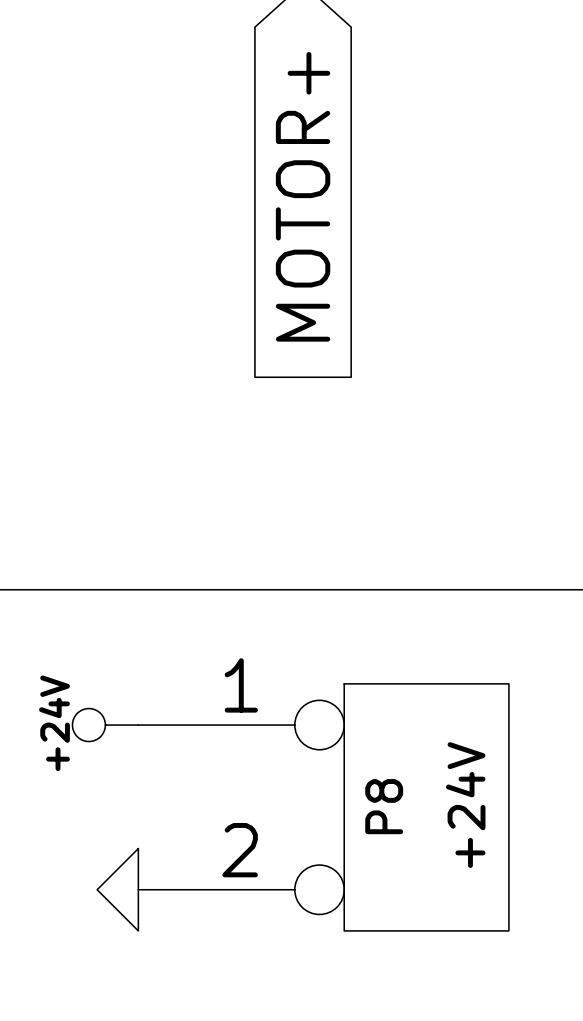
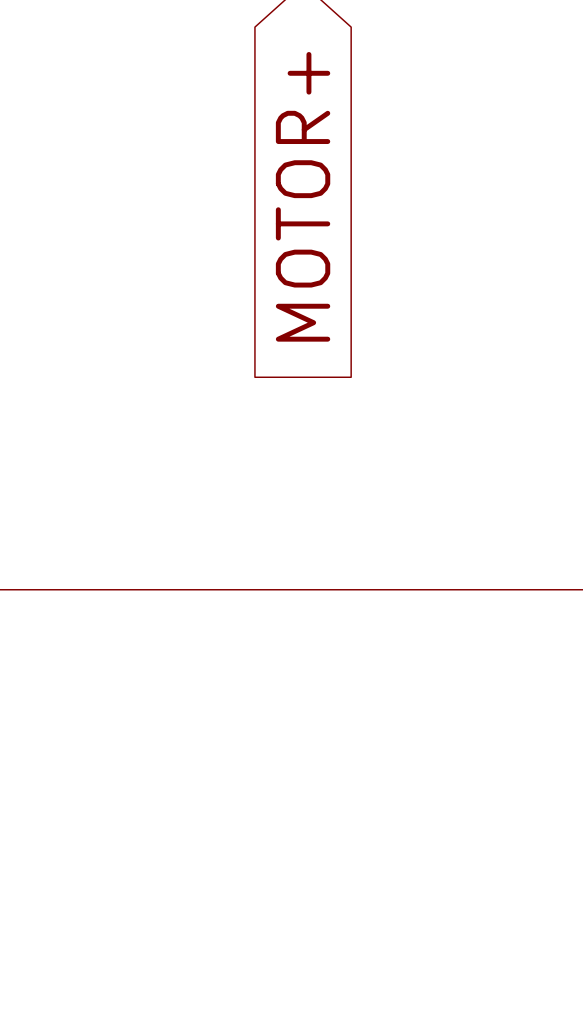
power symbol: +24V (105, 725) -> none
P8: +24V (323, 807) -> none
power symbol: (117, 889) -> none

